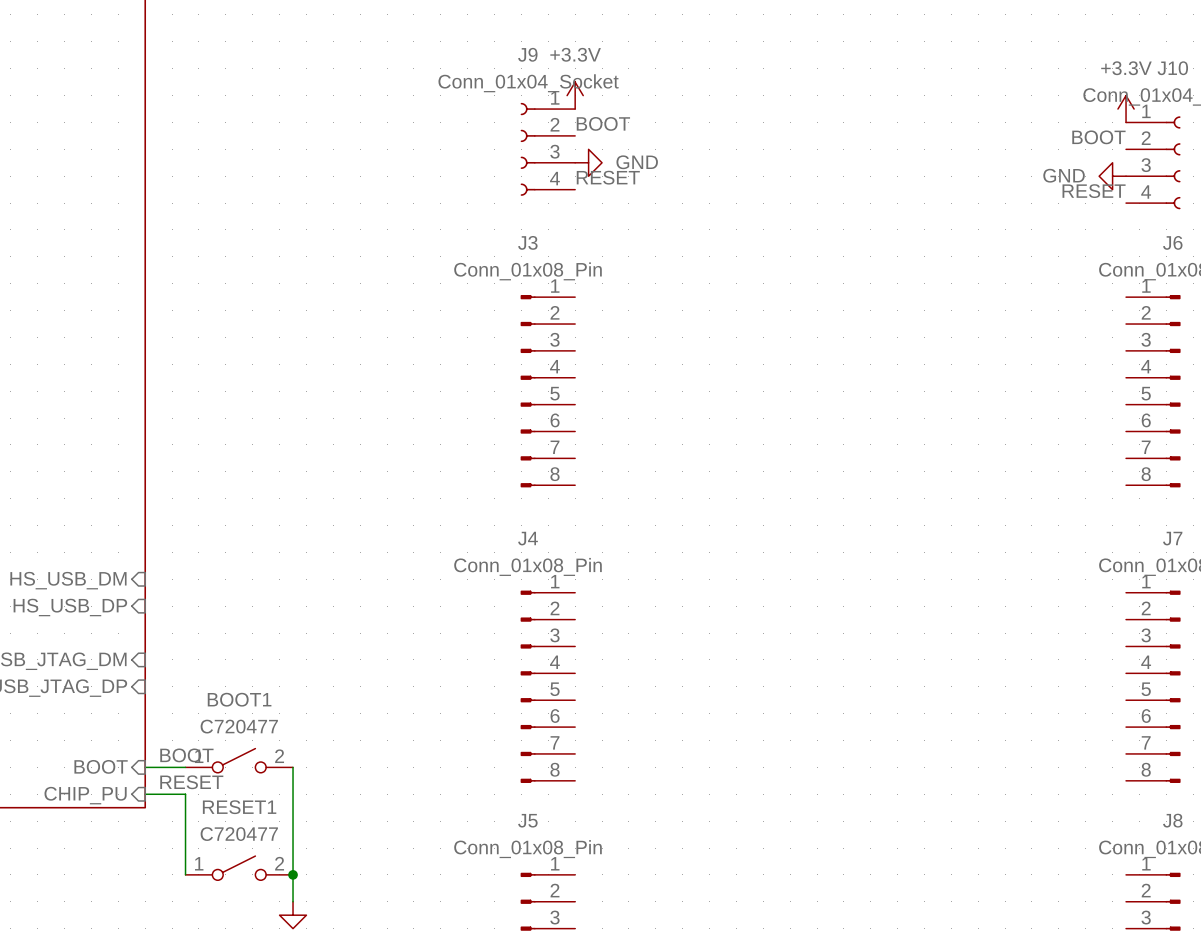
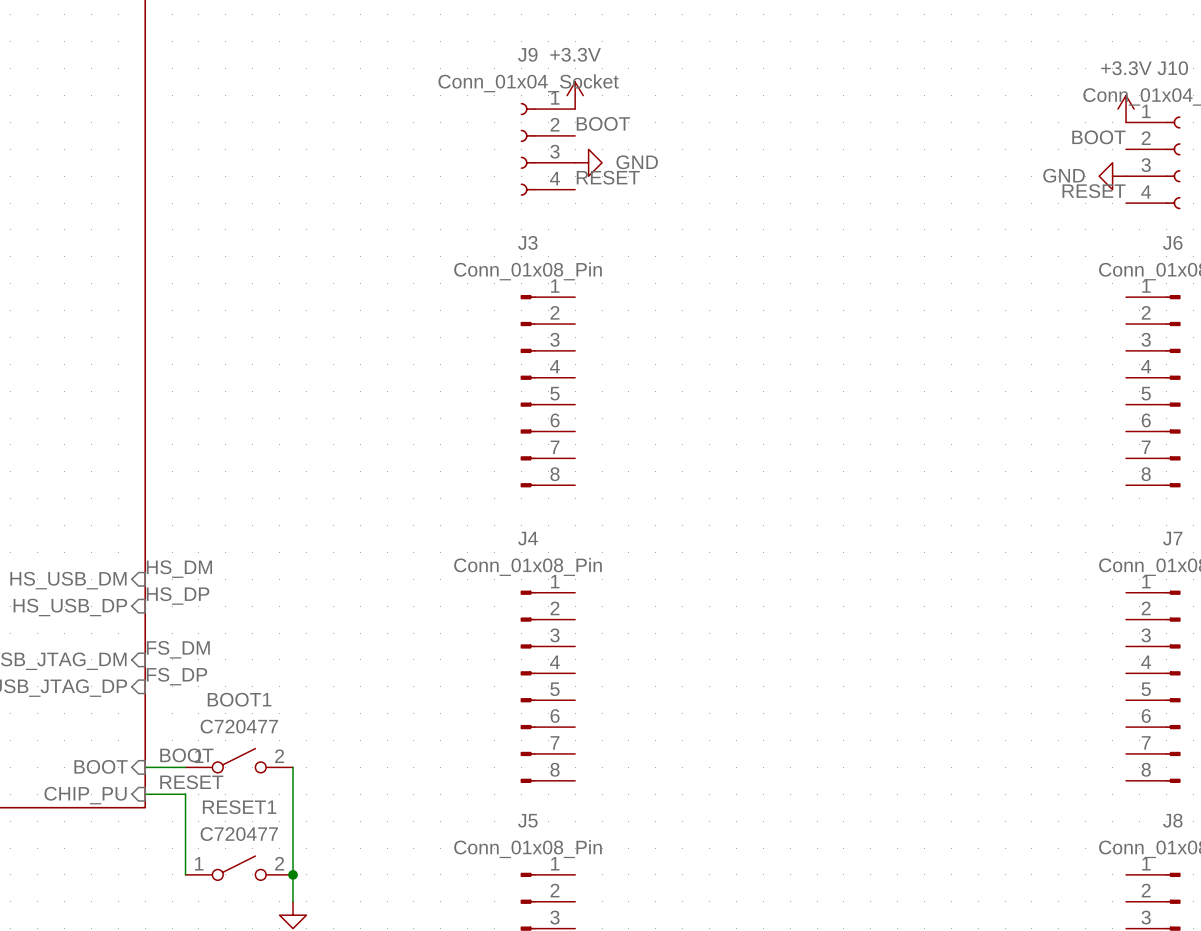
label: none -> HS_DM (179, 569)
label: none -> HS_DP (178, 596)
label: none -> FS_DM (178, 649)
label: none -> FS_DP (176, 676)

